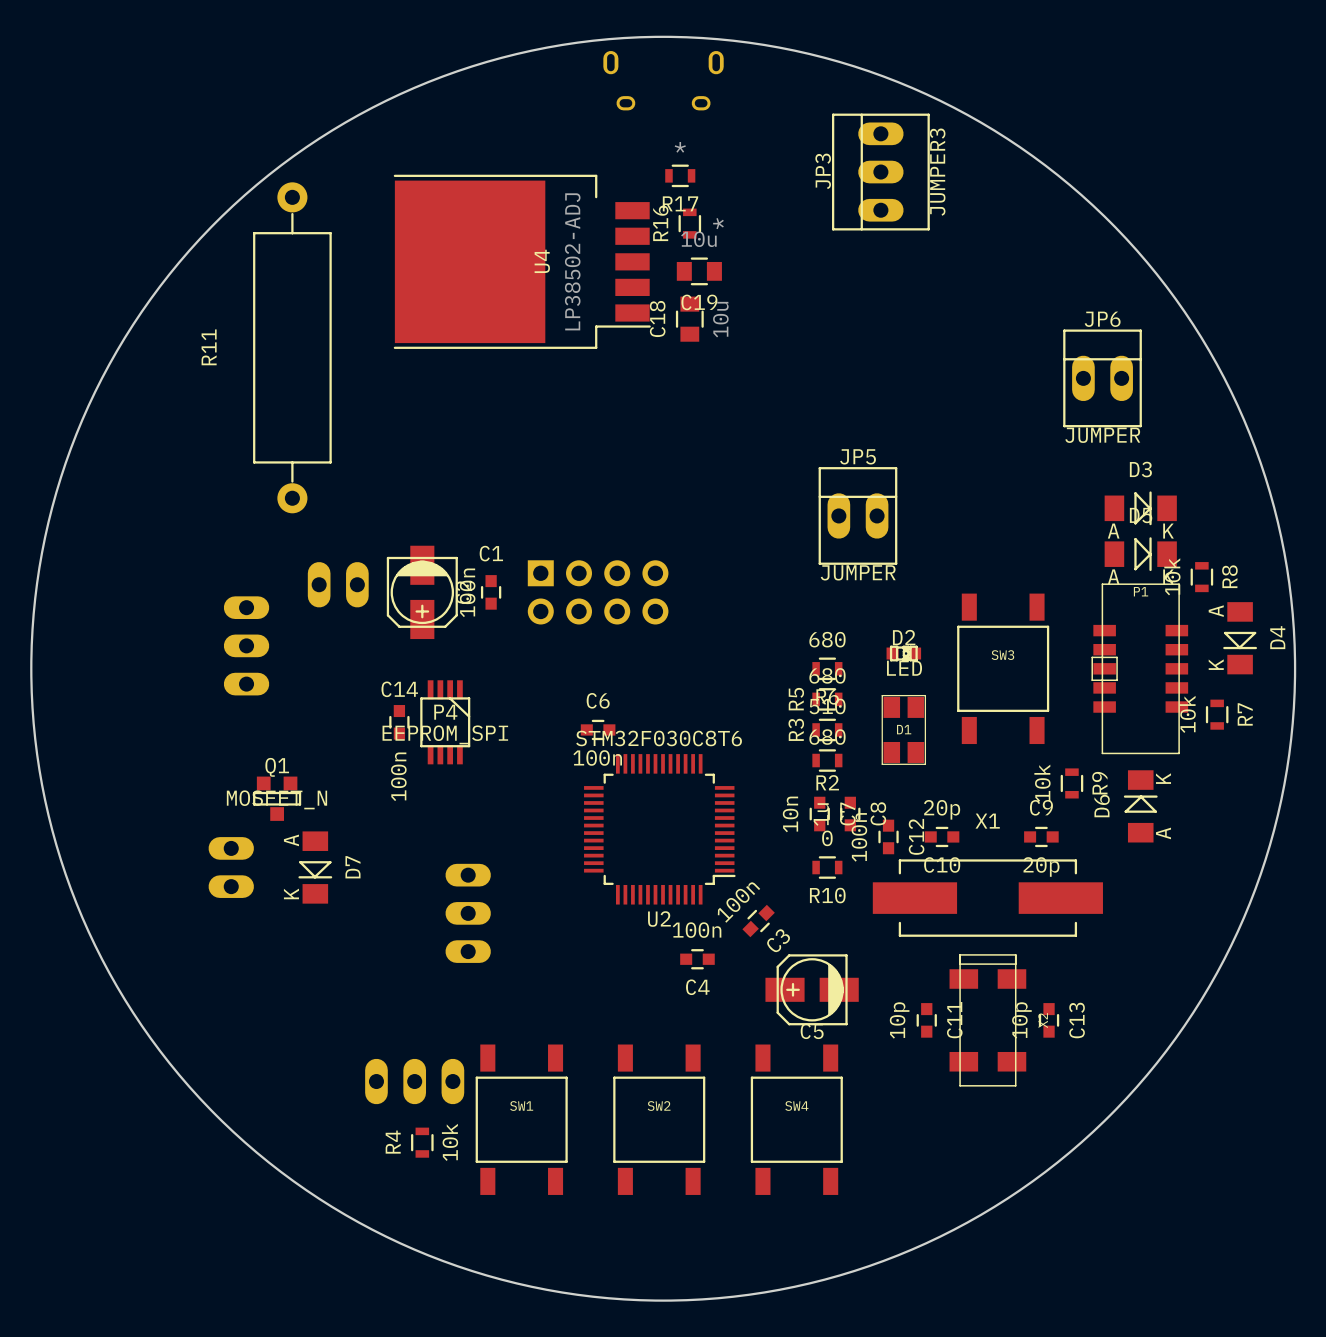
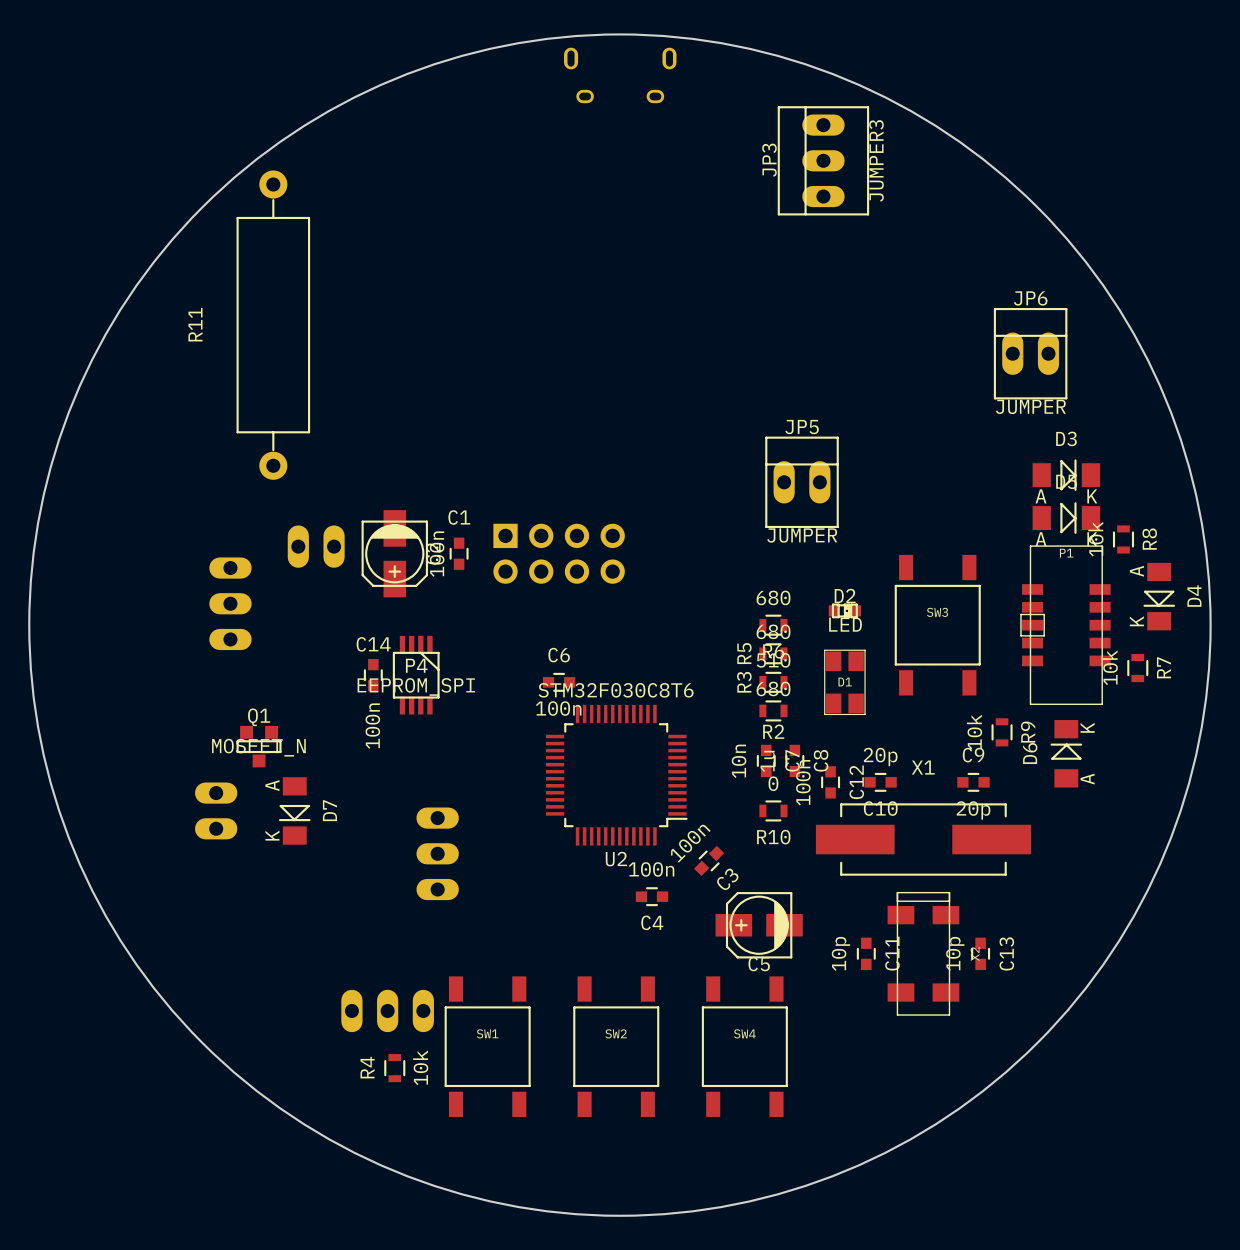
R17: * (680, 175) -> none
R16: * (689, 223) -> none
U4: LP38502-ADJ (522, 261) -> none
C19: 10u (699, 271) -> none
C18: 10u (689, 319) -> none

